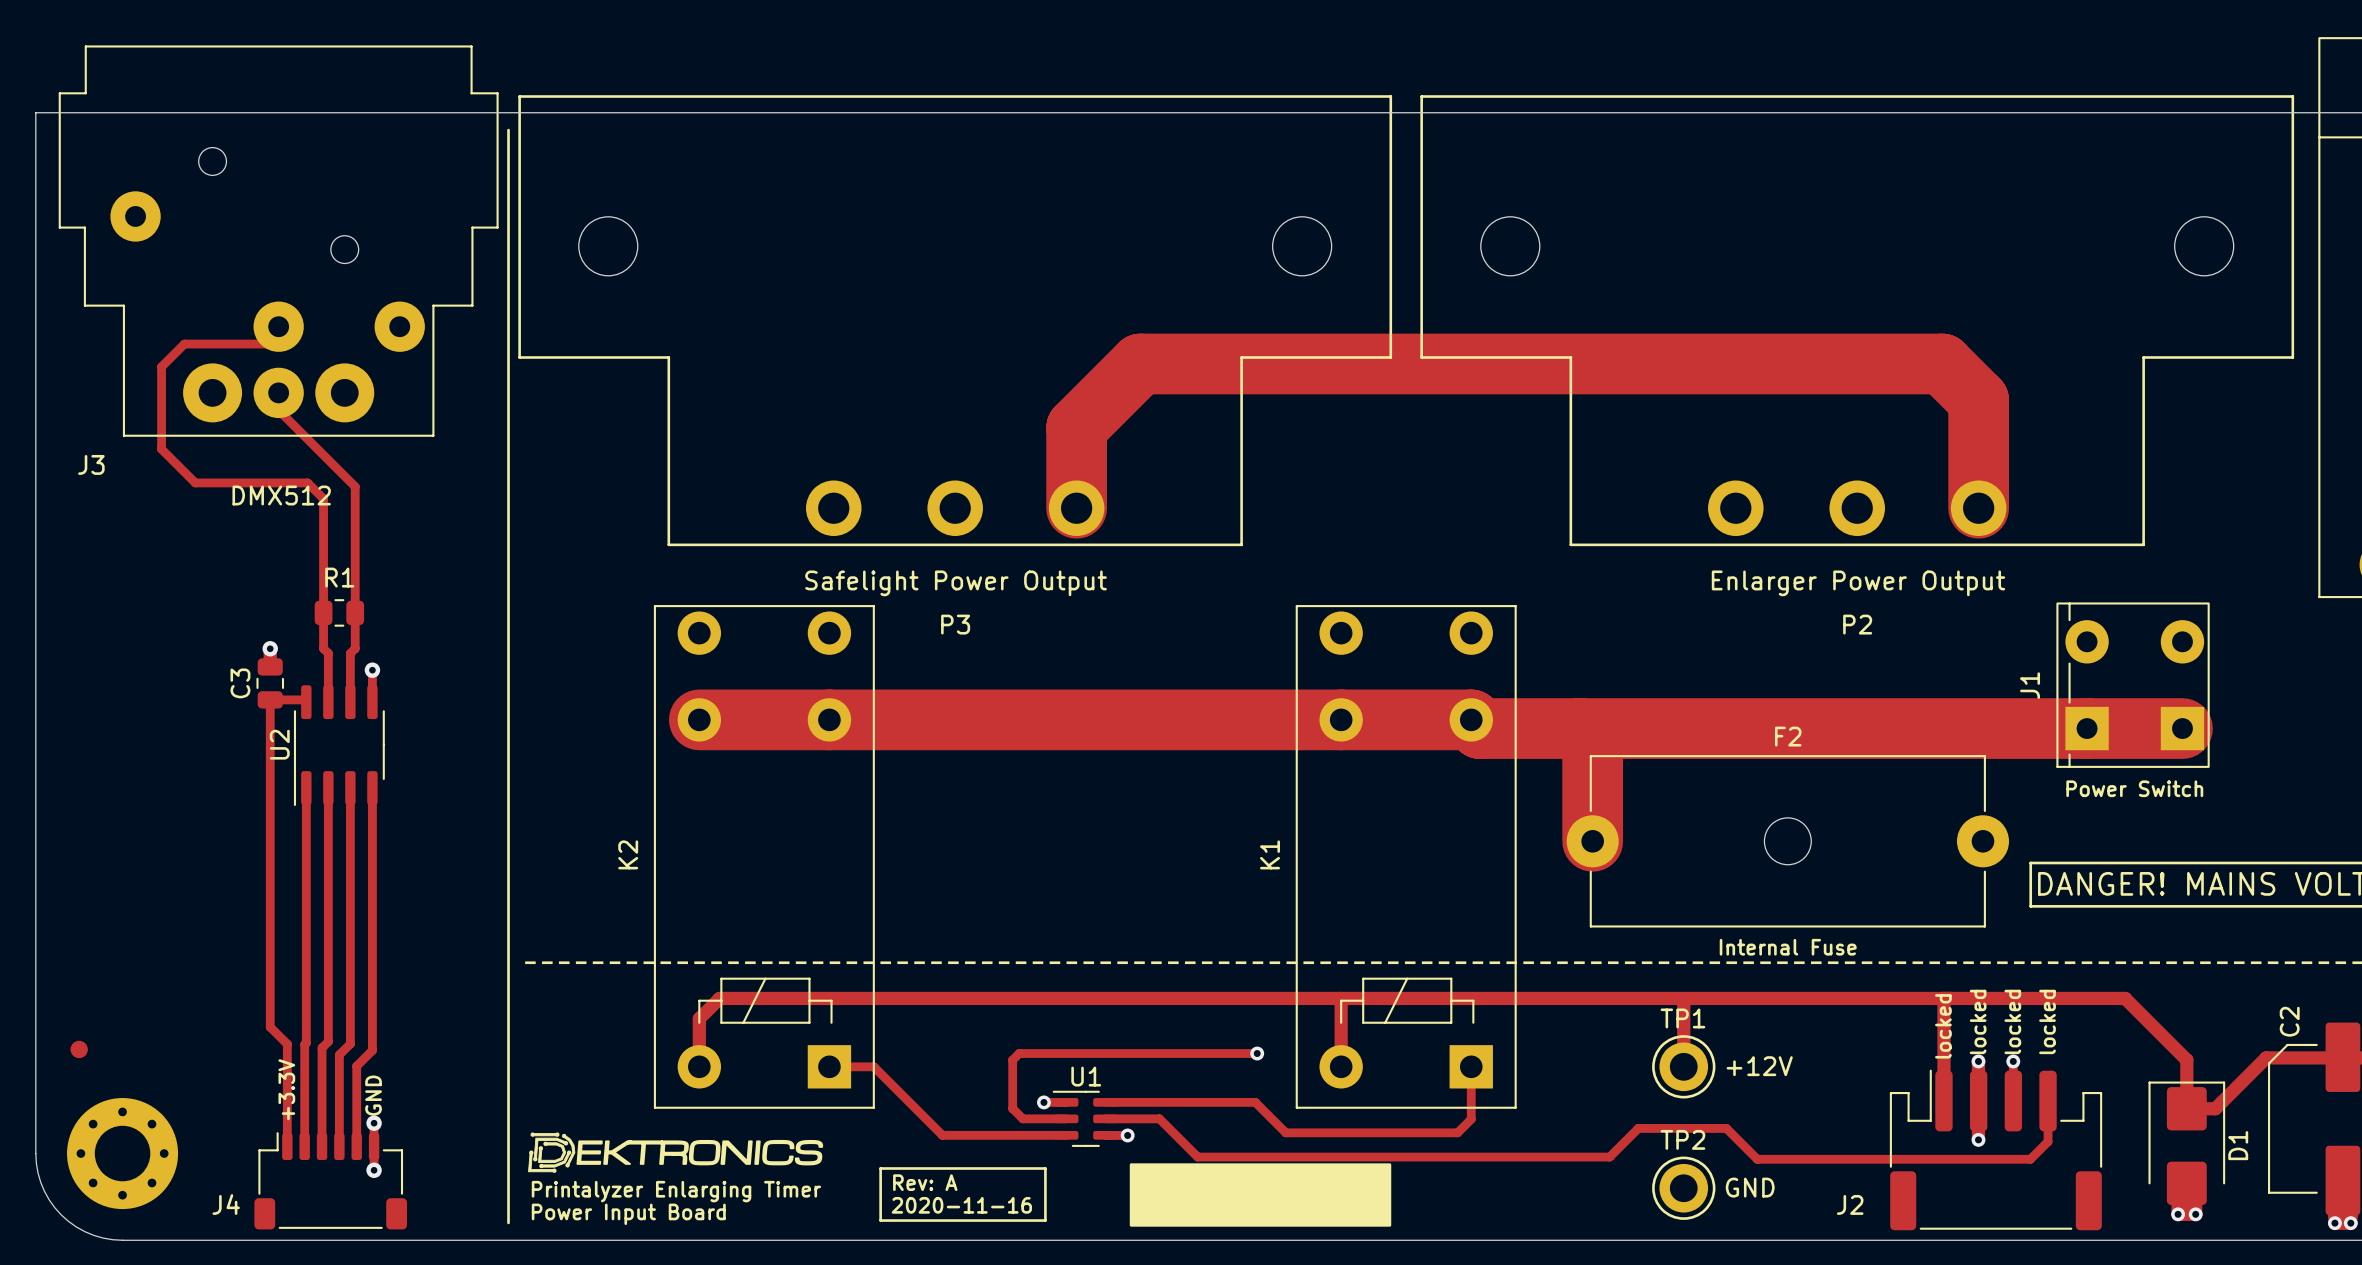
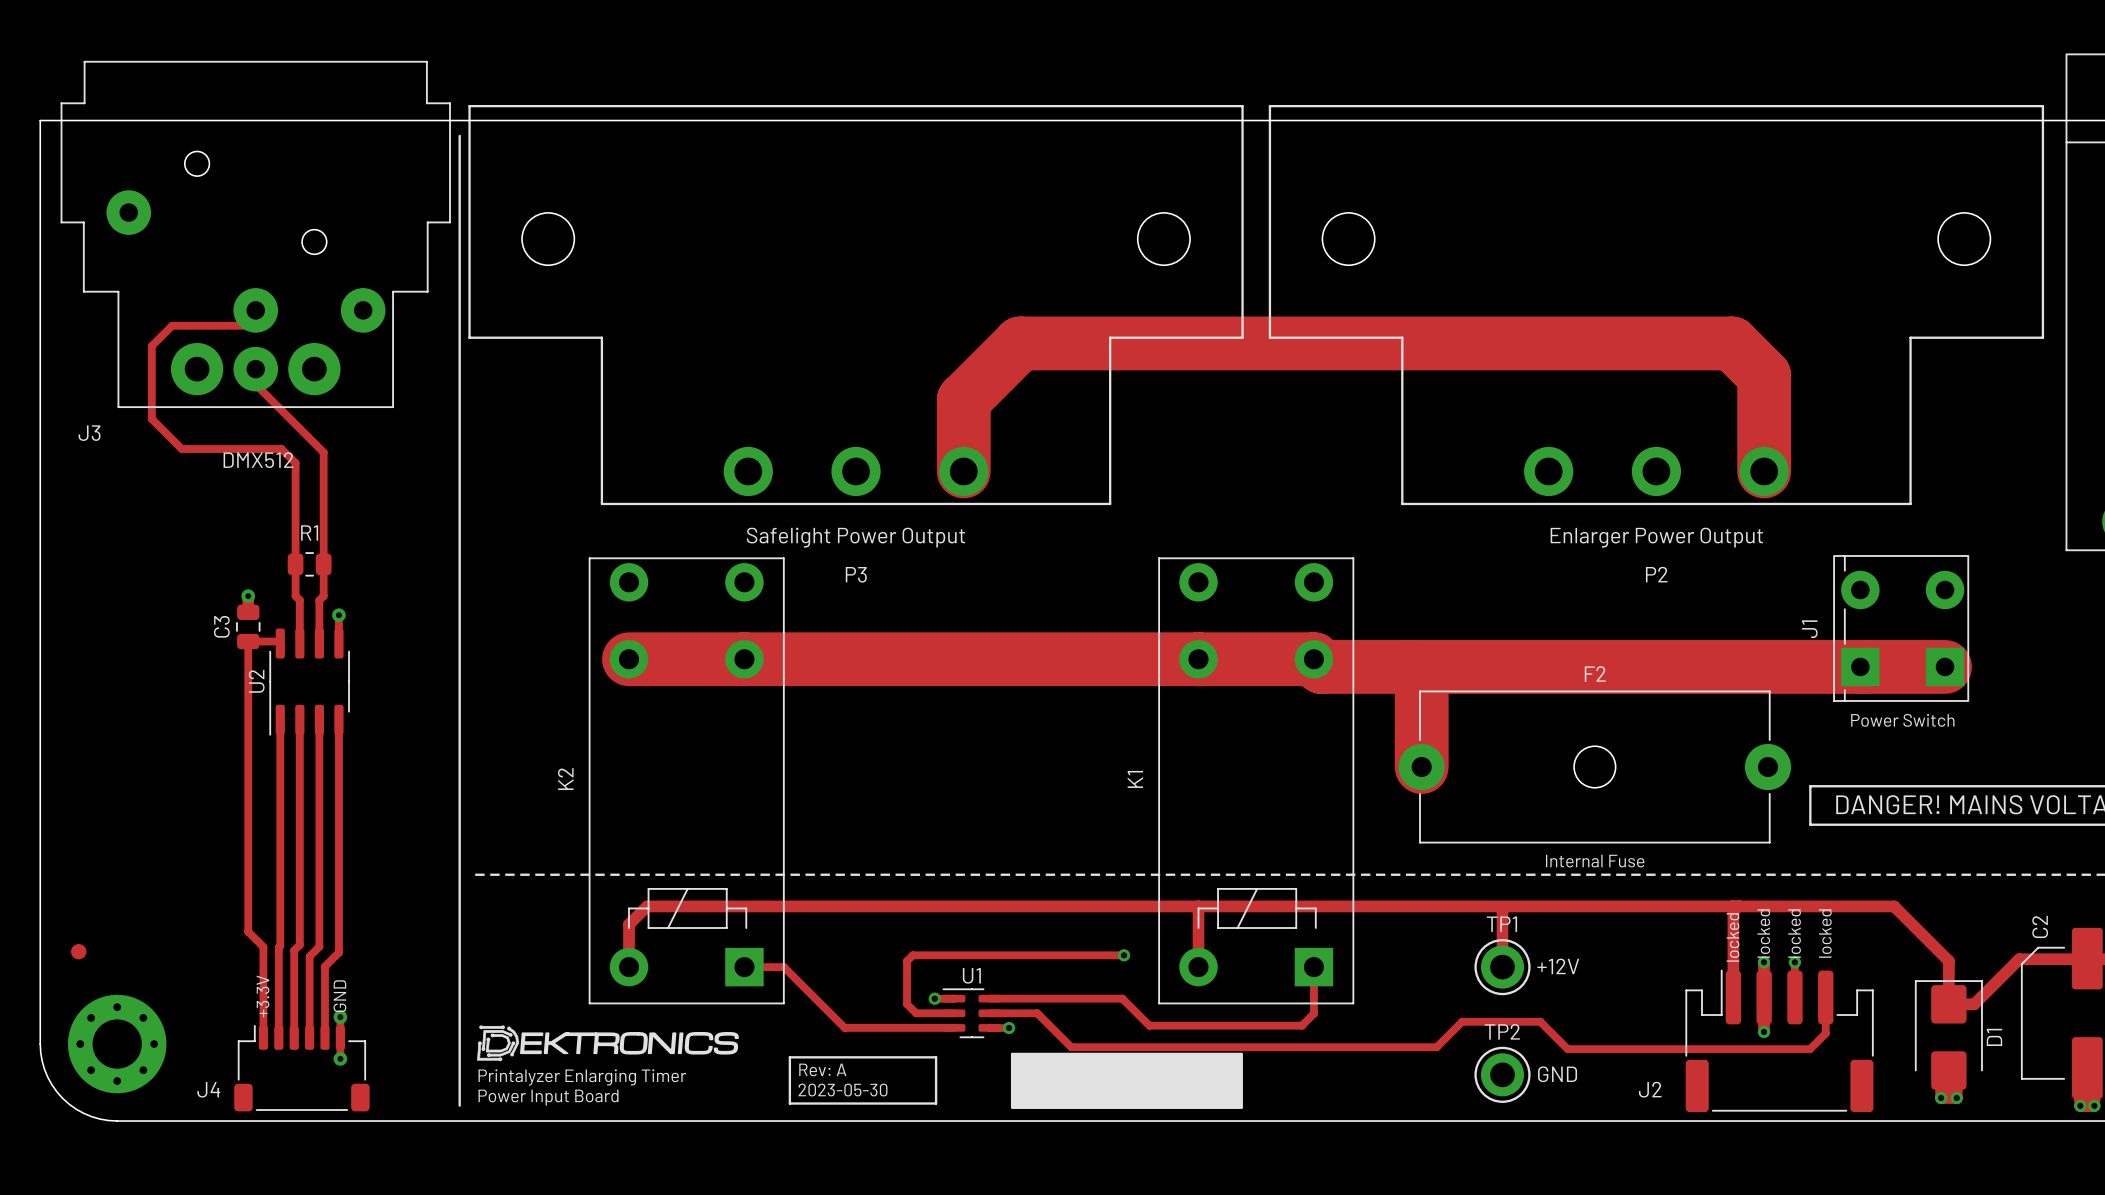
text: 2020-11-16 (961, 1205) -> 2023-05-30 (843, 1090)

